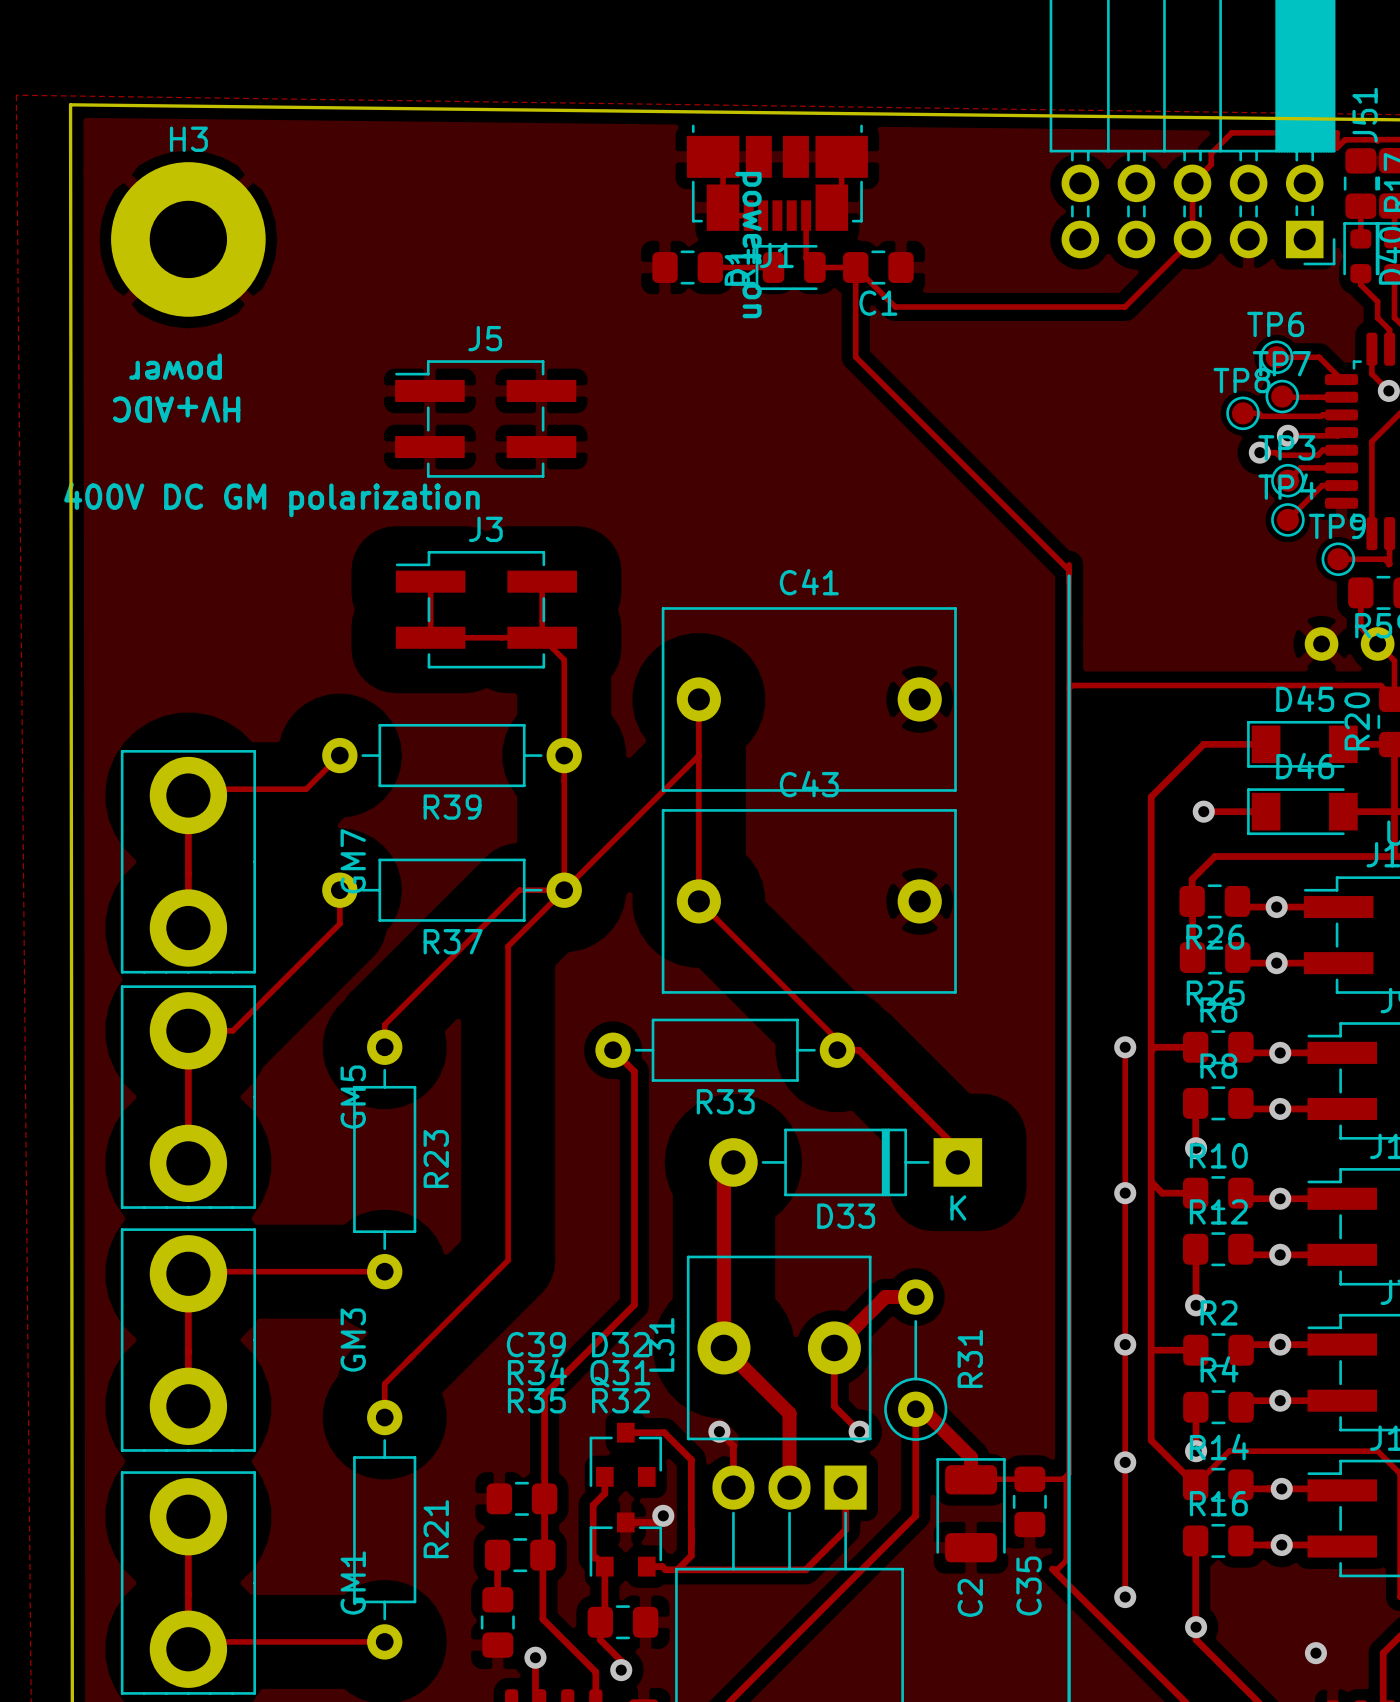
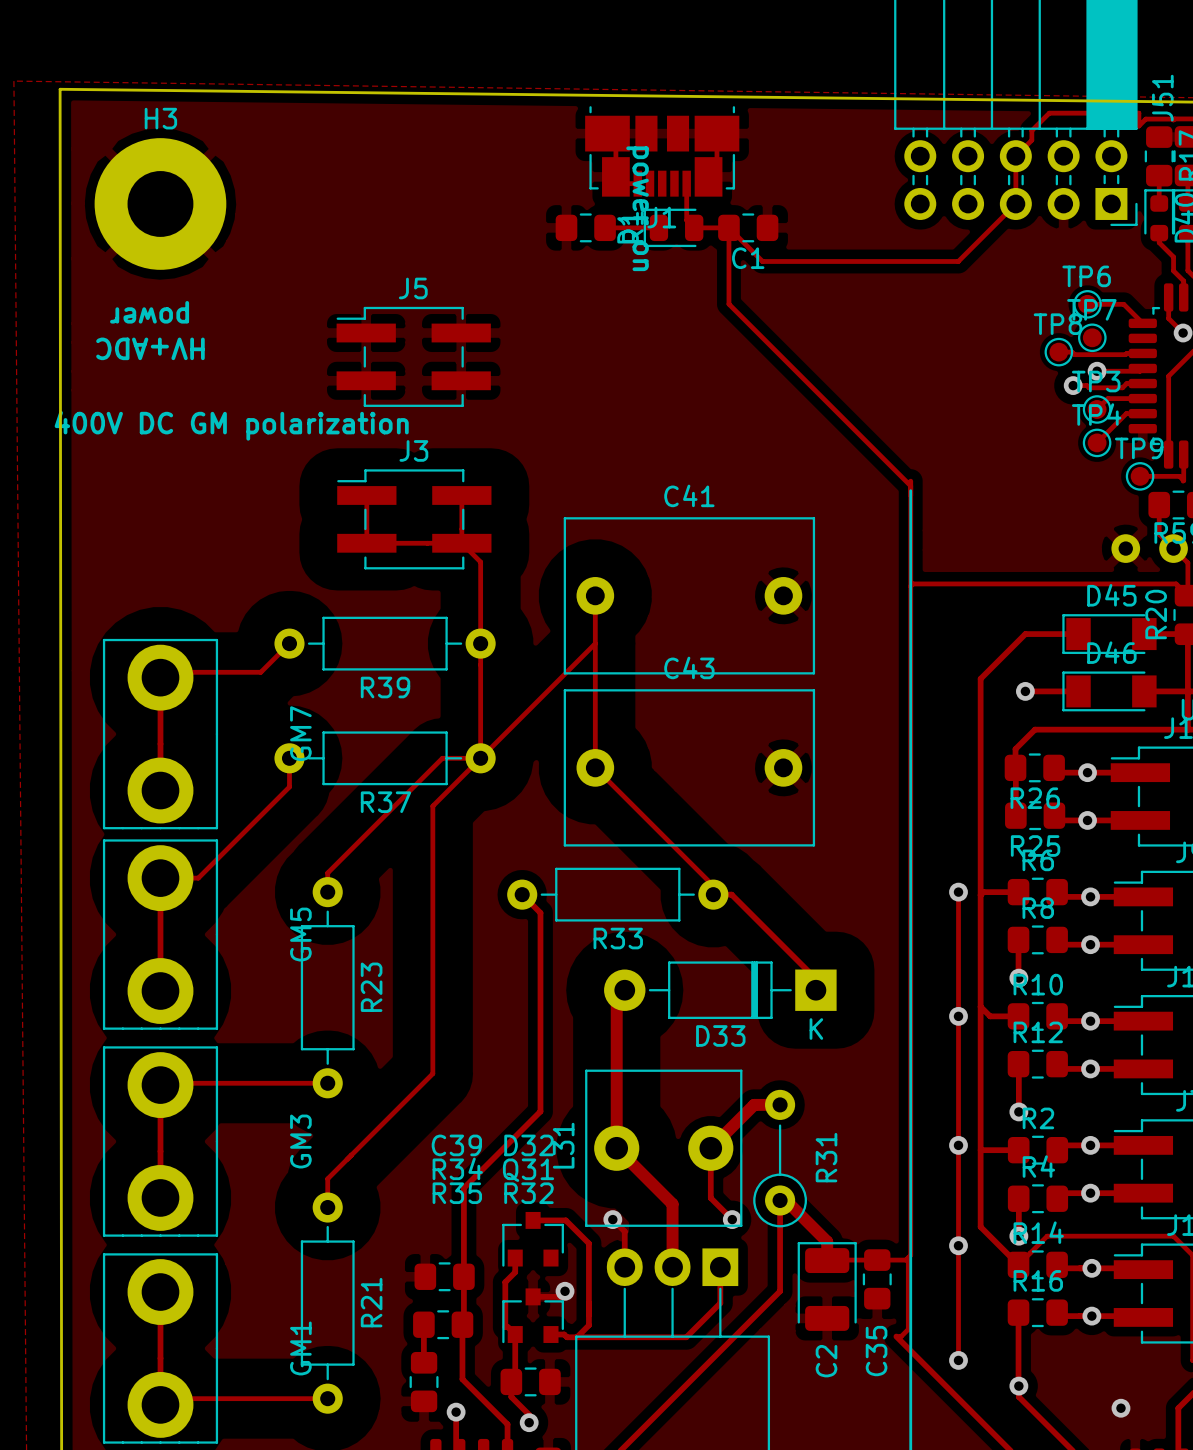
track: (1282, 396) (1341, 397) -> none

